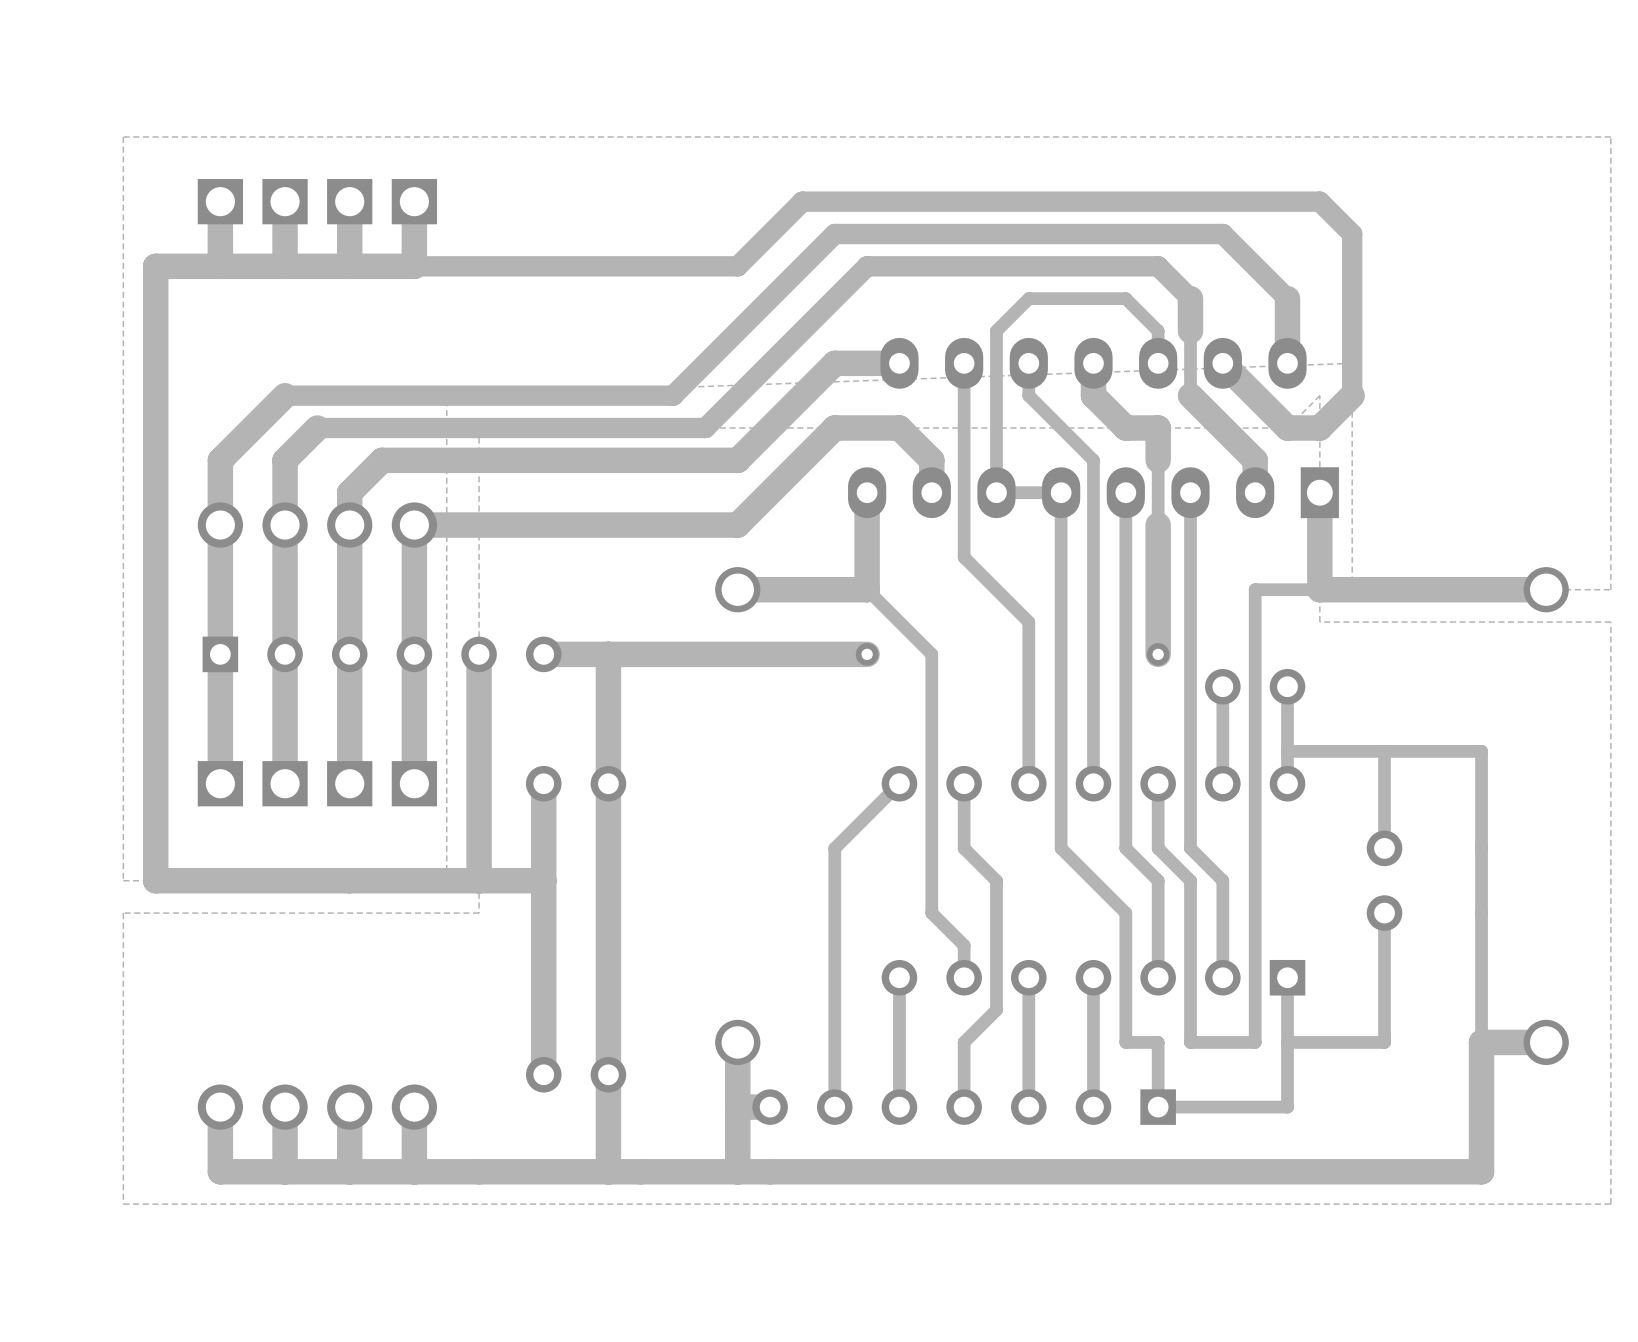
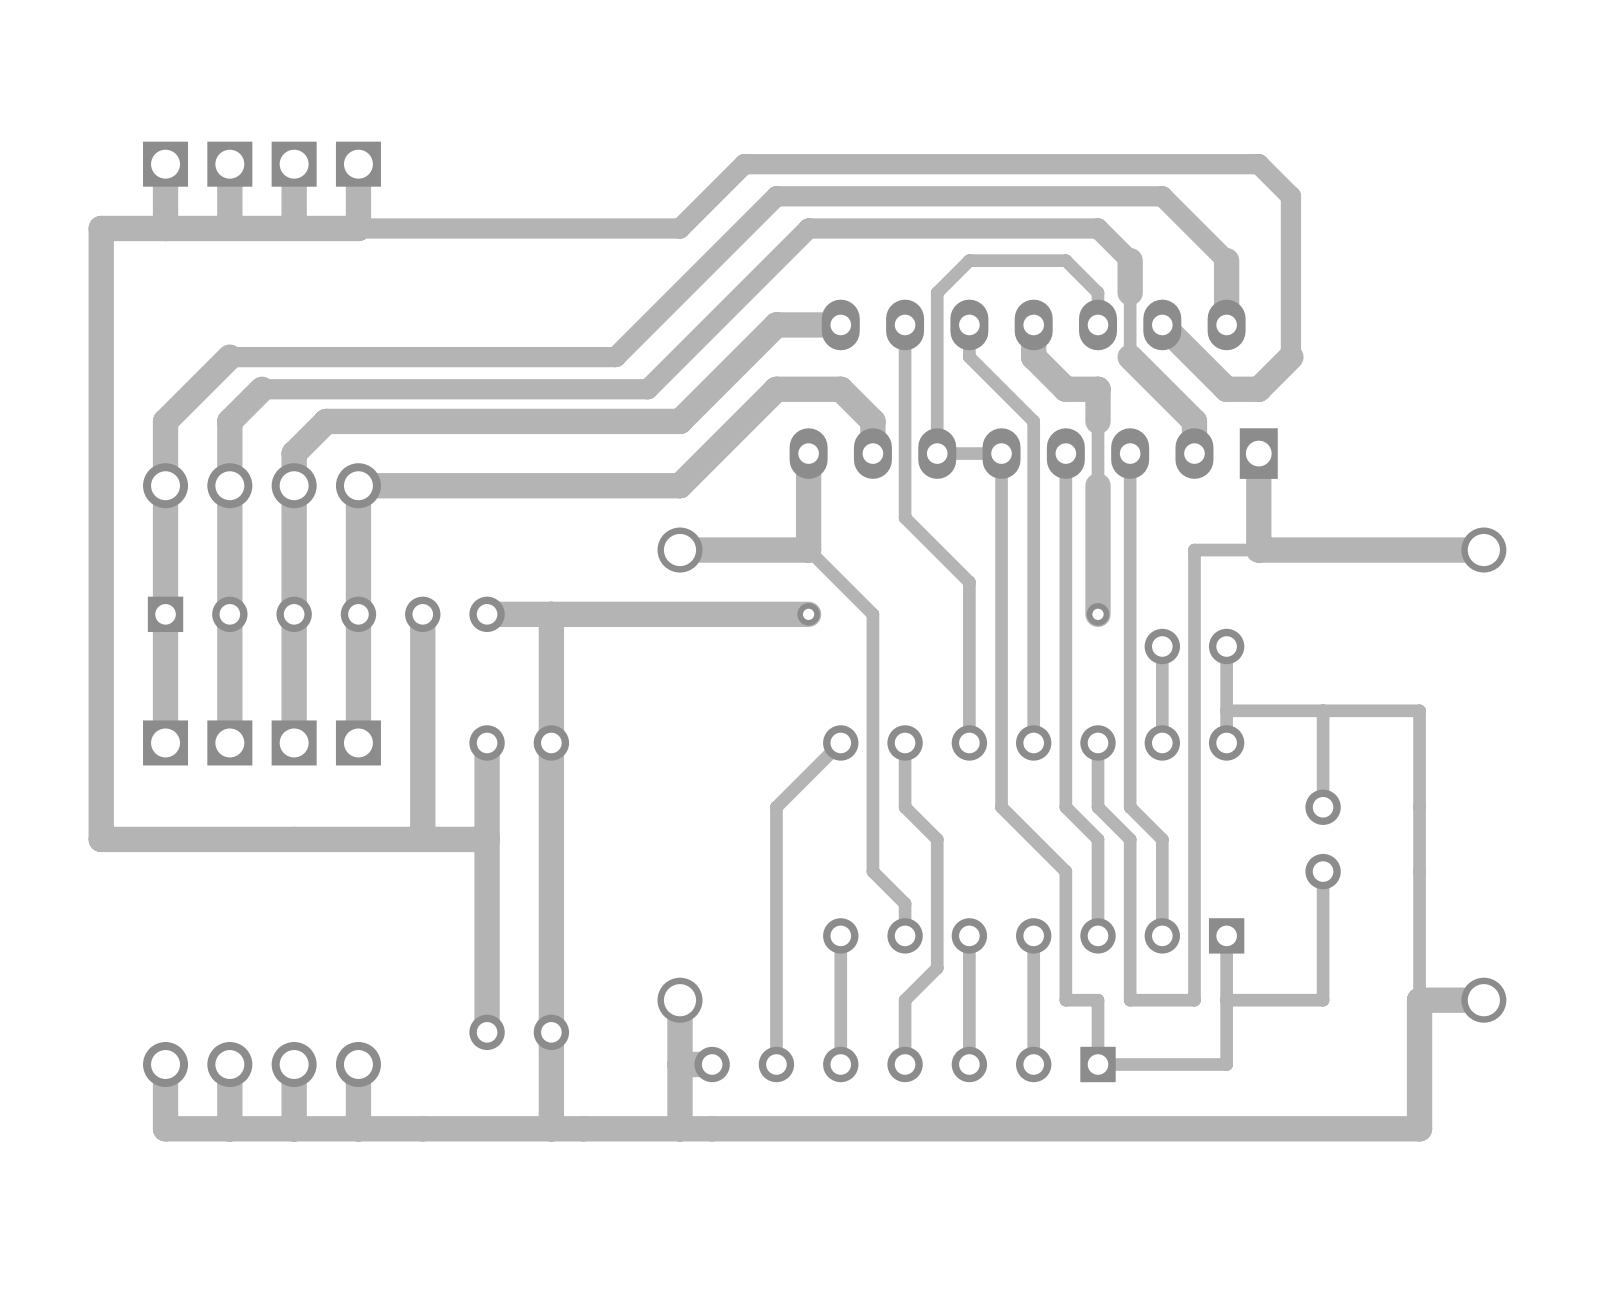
zone outline: (1610, 136) (1610, 589) (1352, 589) (1352, 363) (446, 395) (446, 880) (123, 880) (123, 136) (1610, 136) -> none
zone outline: (1319, 395) (1319, 622) (1610, 622) (1610, 1204) (123, 1204) (123, 913) (479, 913) (479, 428) (1287, 428) (1319, 395) -> none

